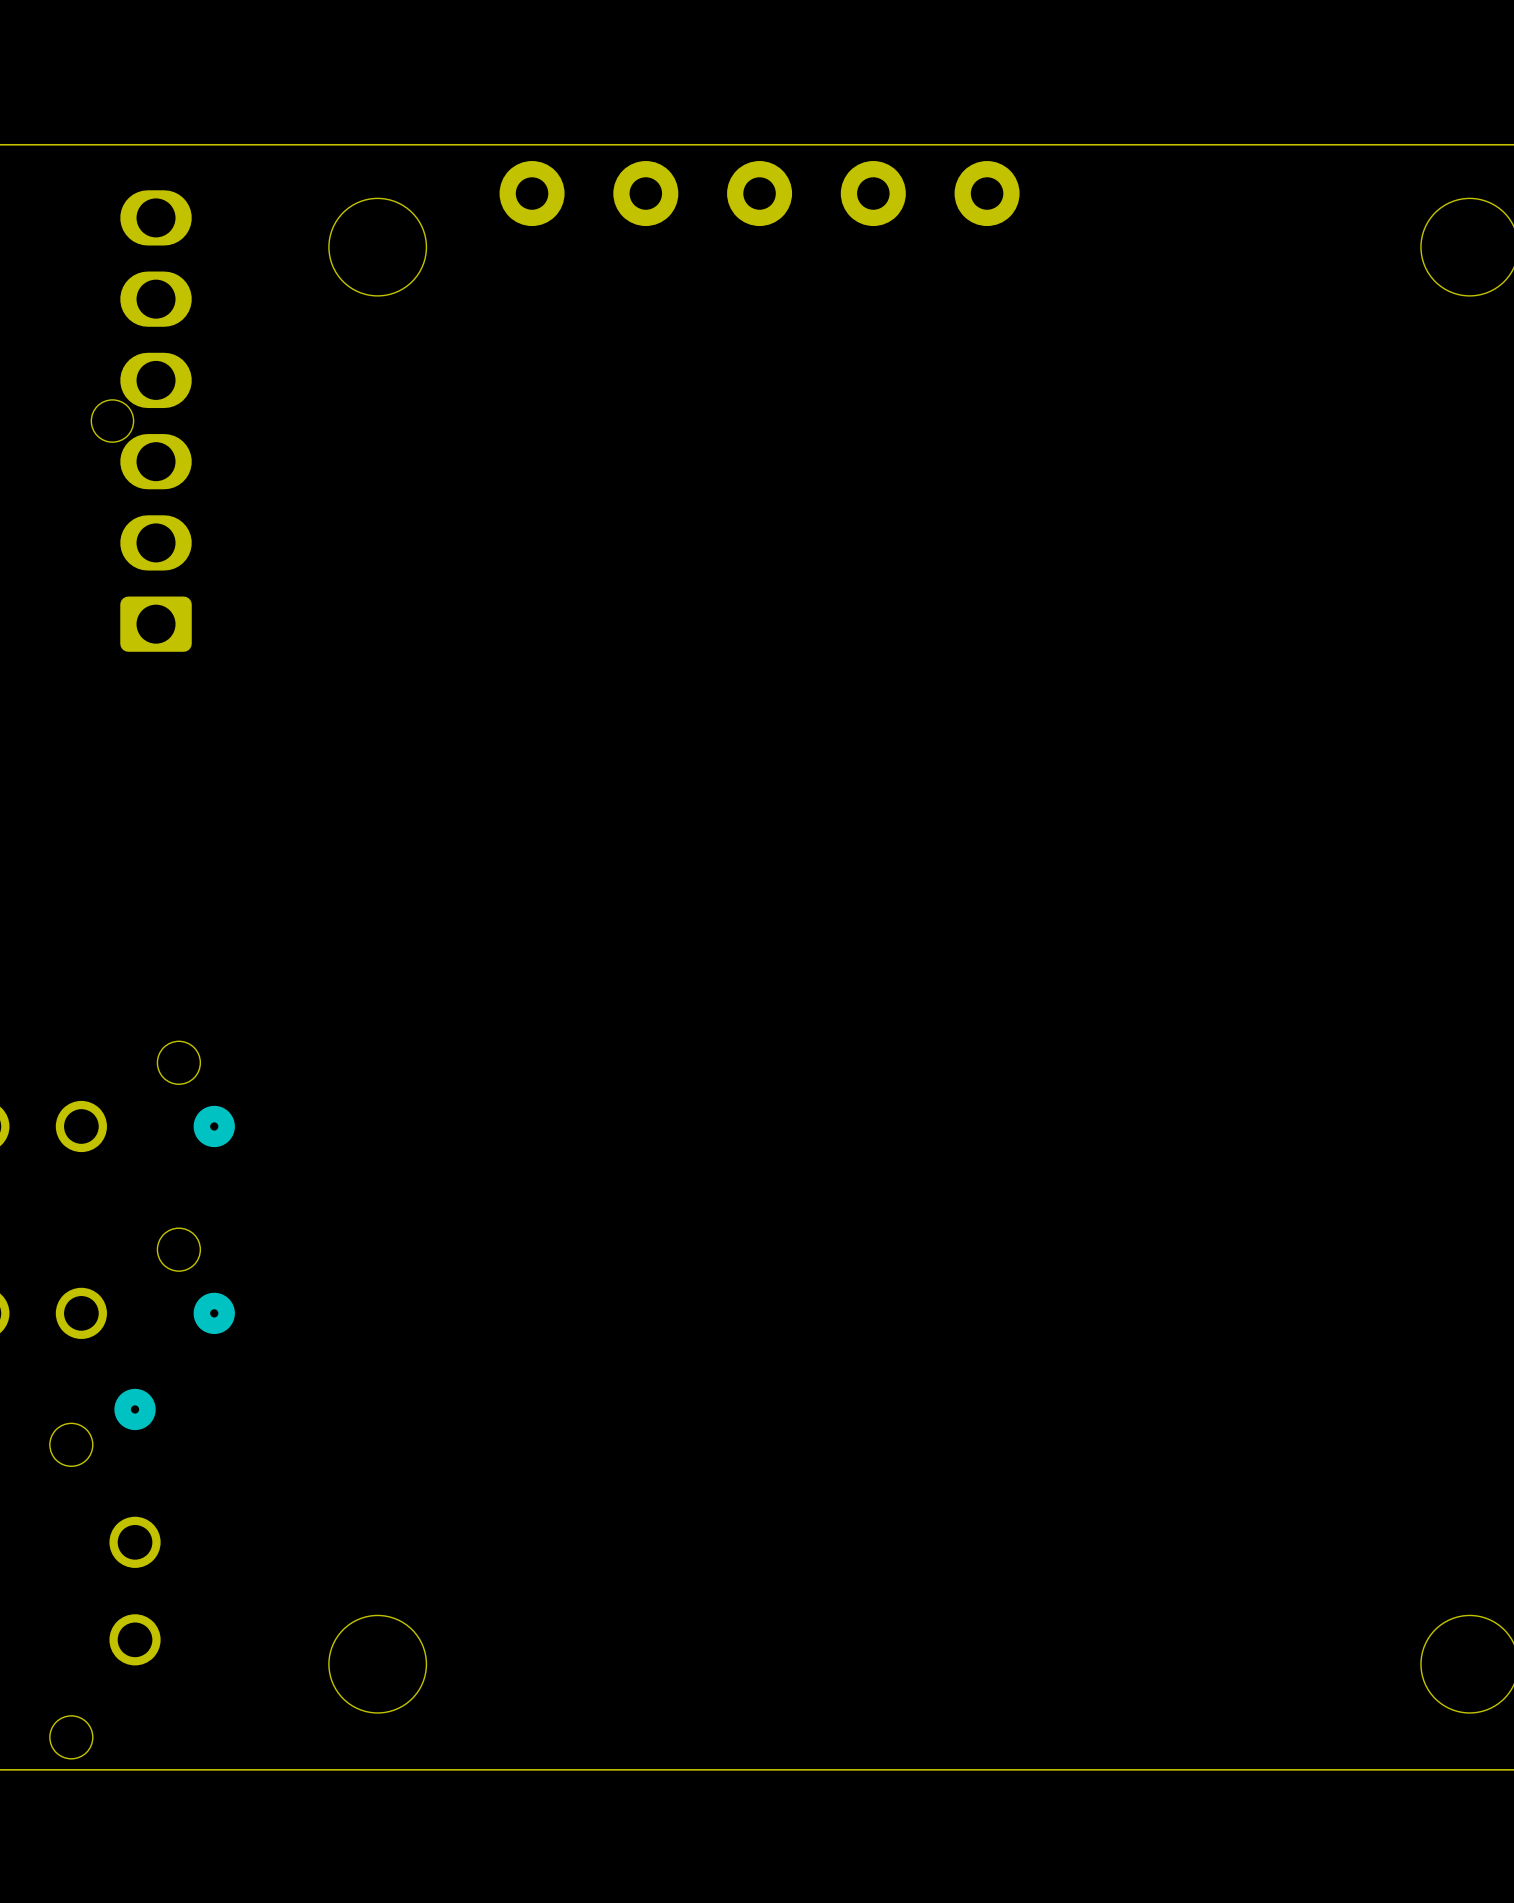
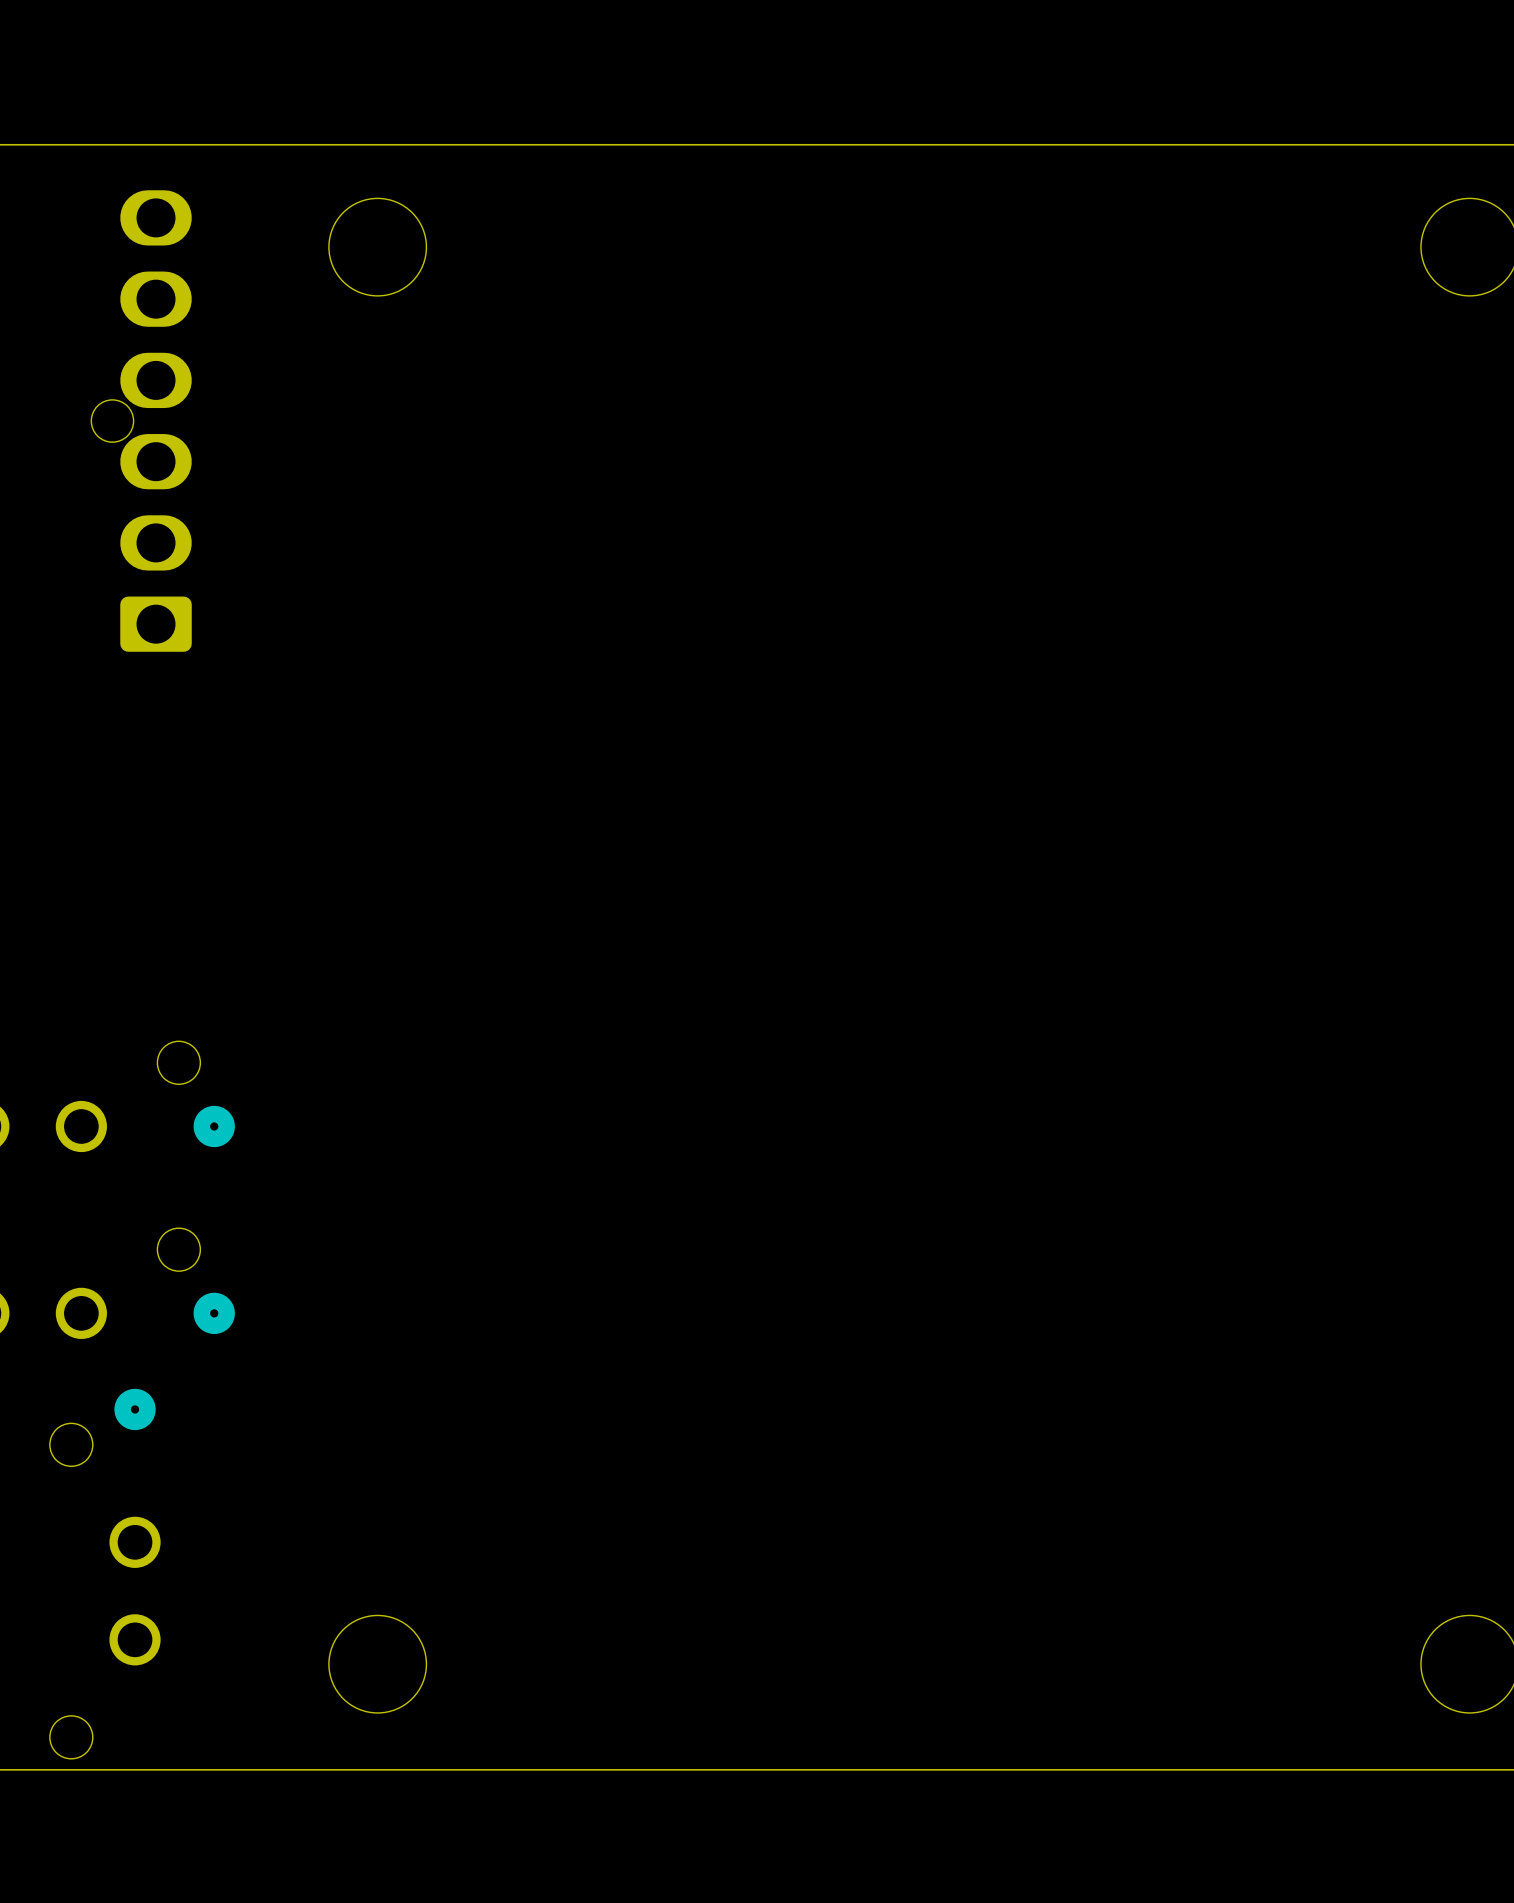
part: (532, 193) -> none
part: (645, 193) -> none
part: (759, 193) -> none
part: (873, 193) -> none
part: (987, 193) -> none

